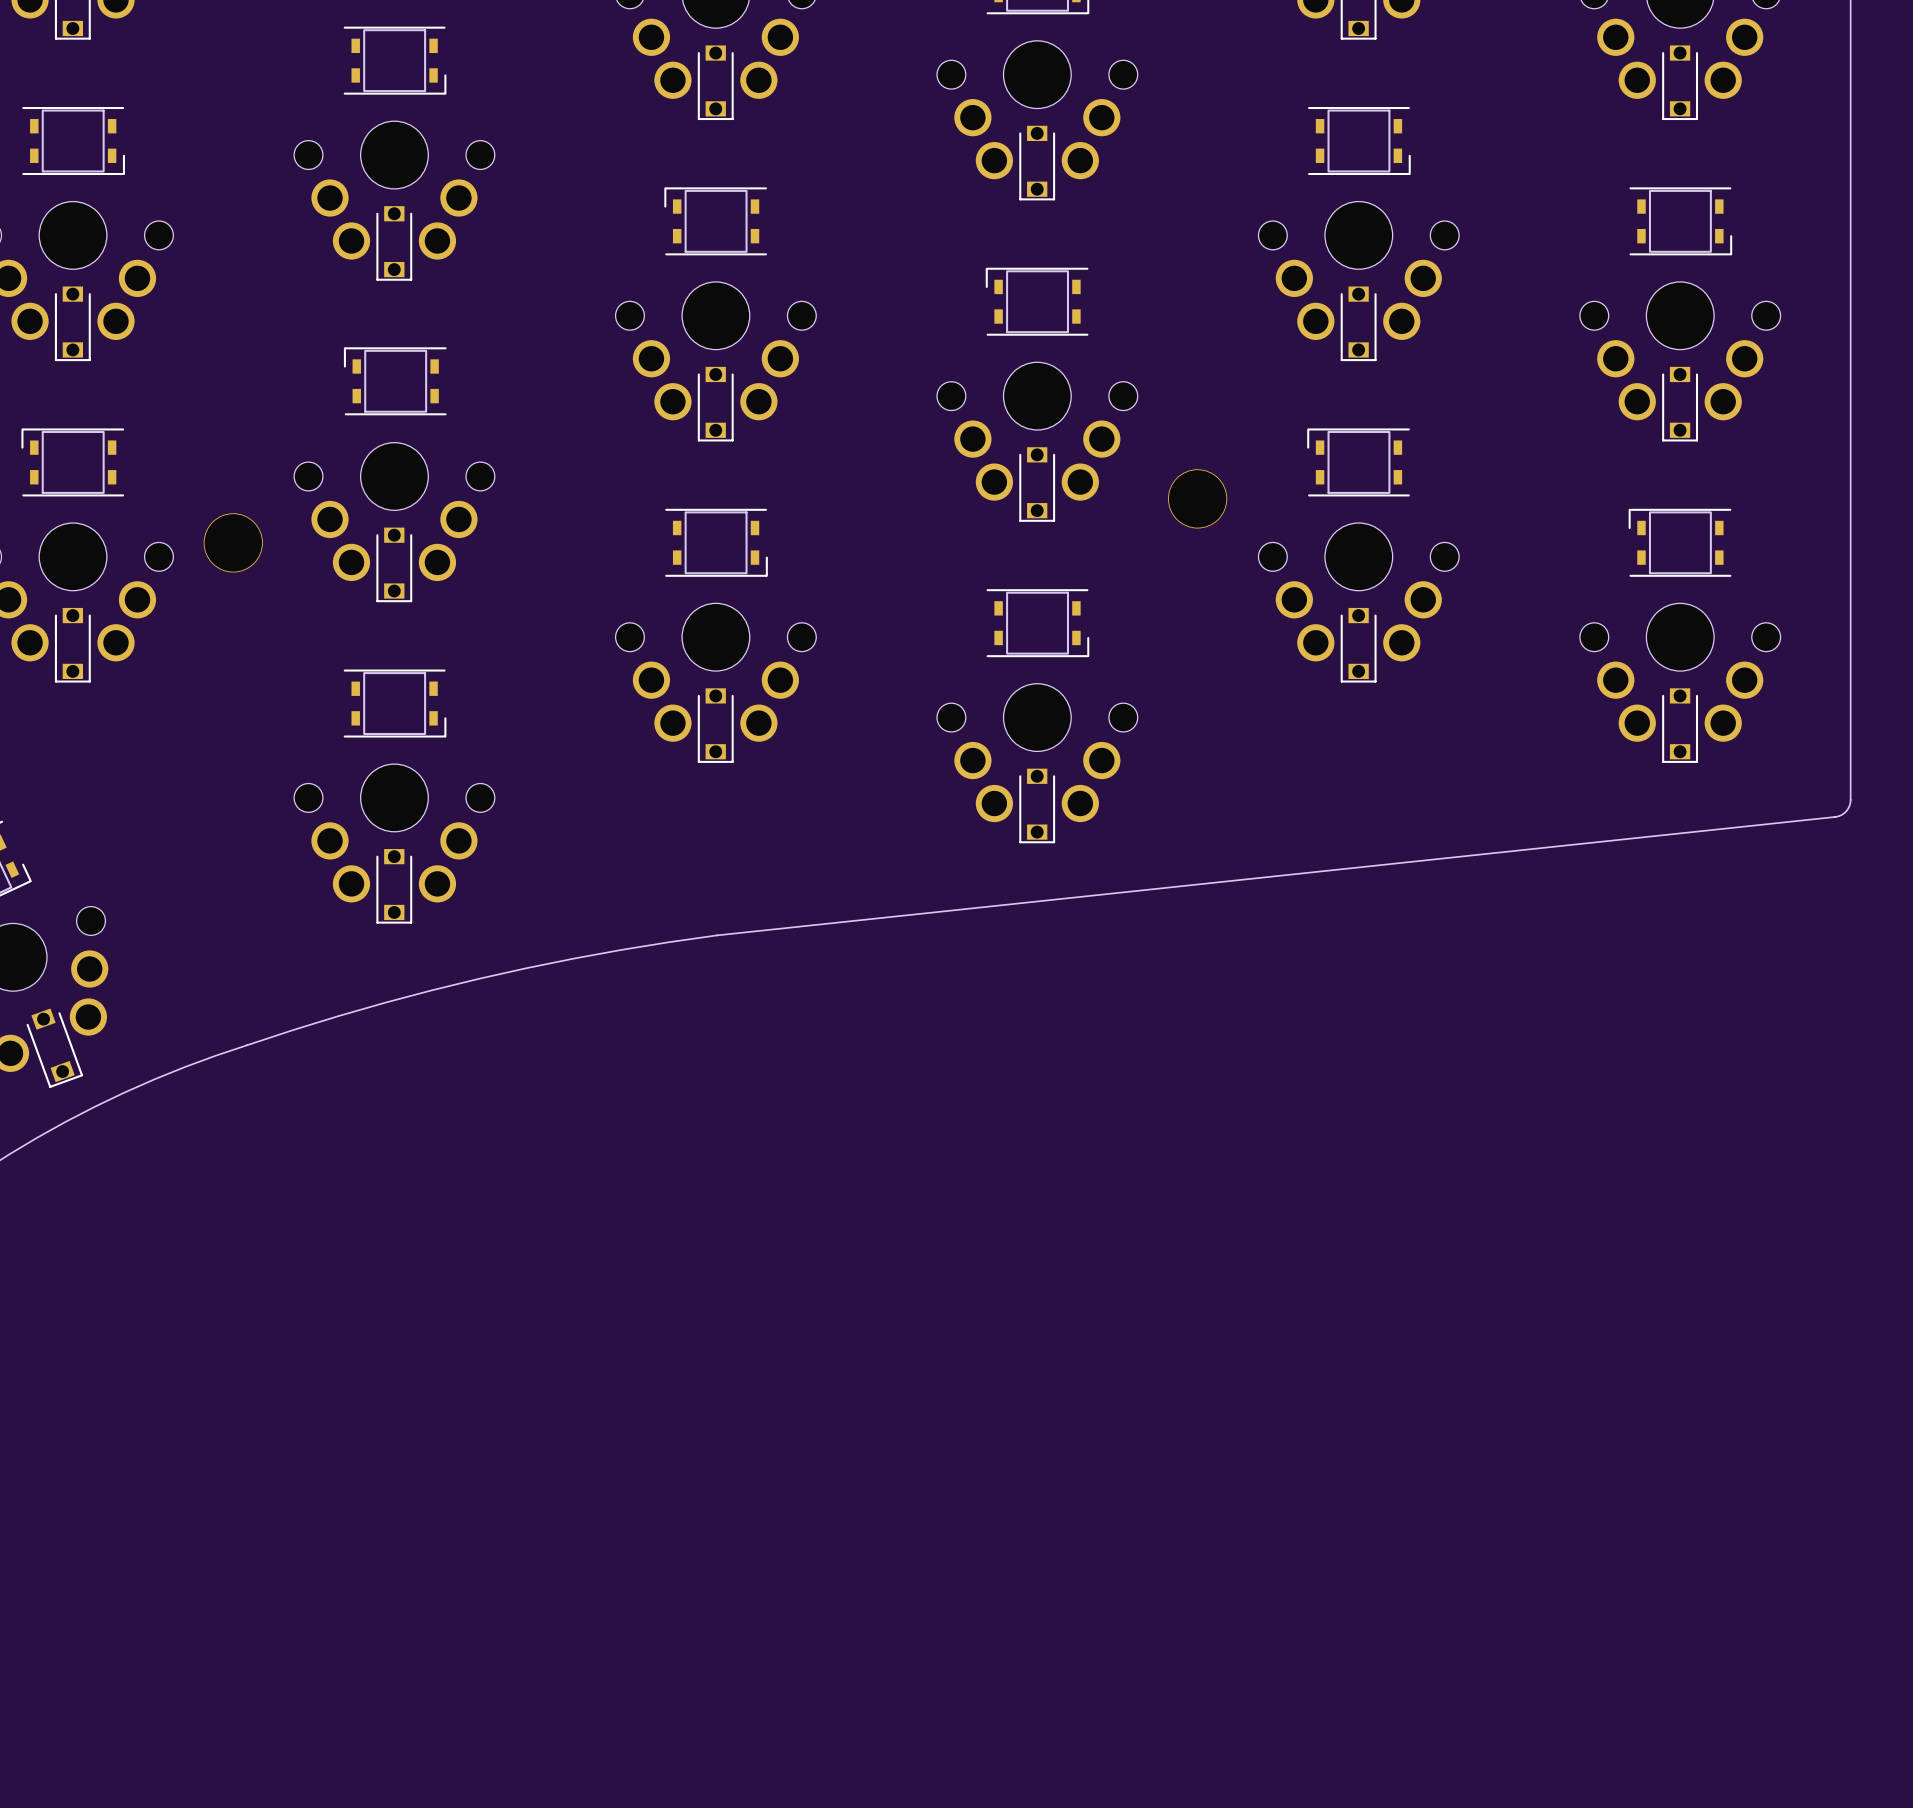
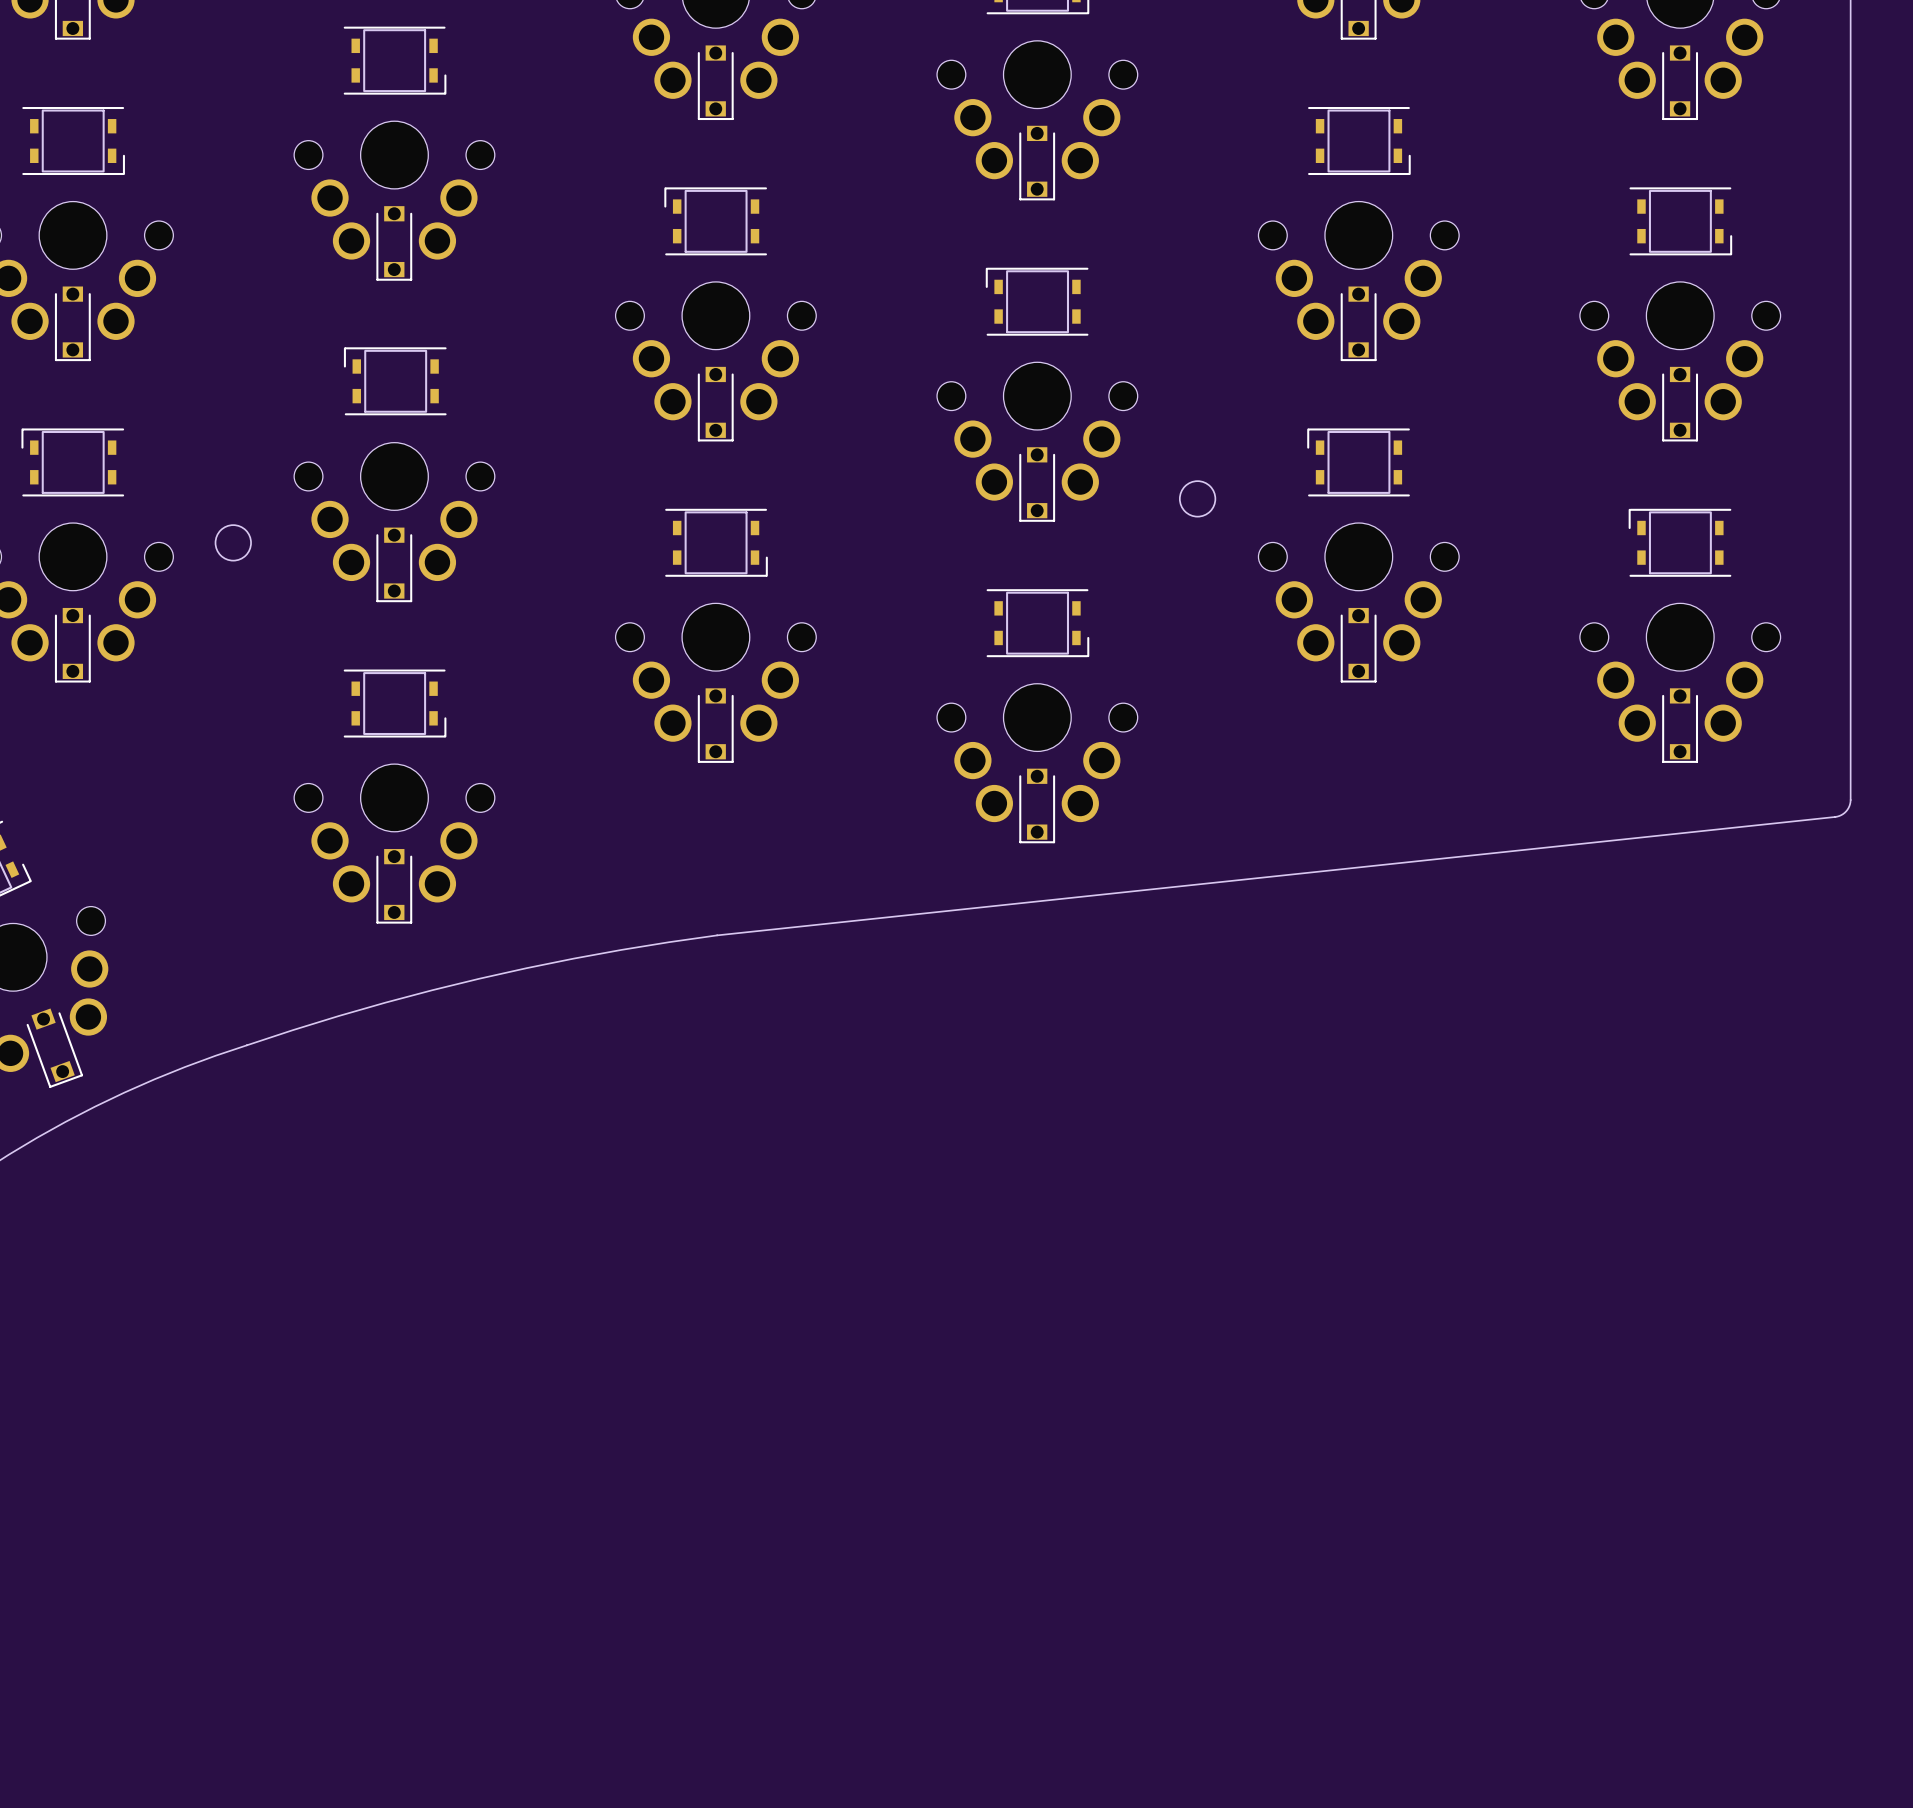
round board edge: none -> [1178, 480, 1217, 518]
part: (1197, 498) -> none
round board edge: none -> [214, 524, 252, 562]
part: (233, 542) -> none

